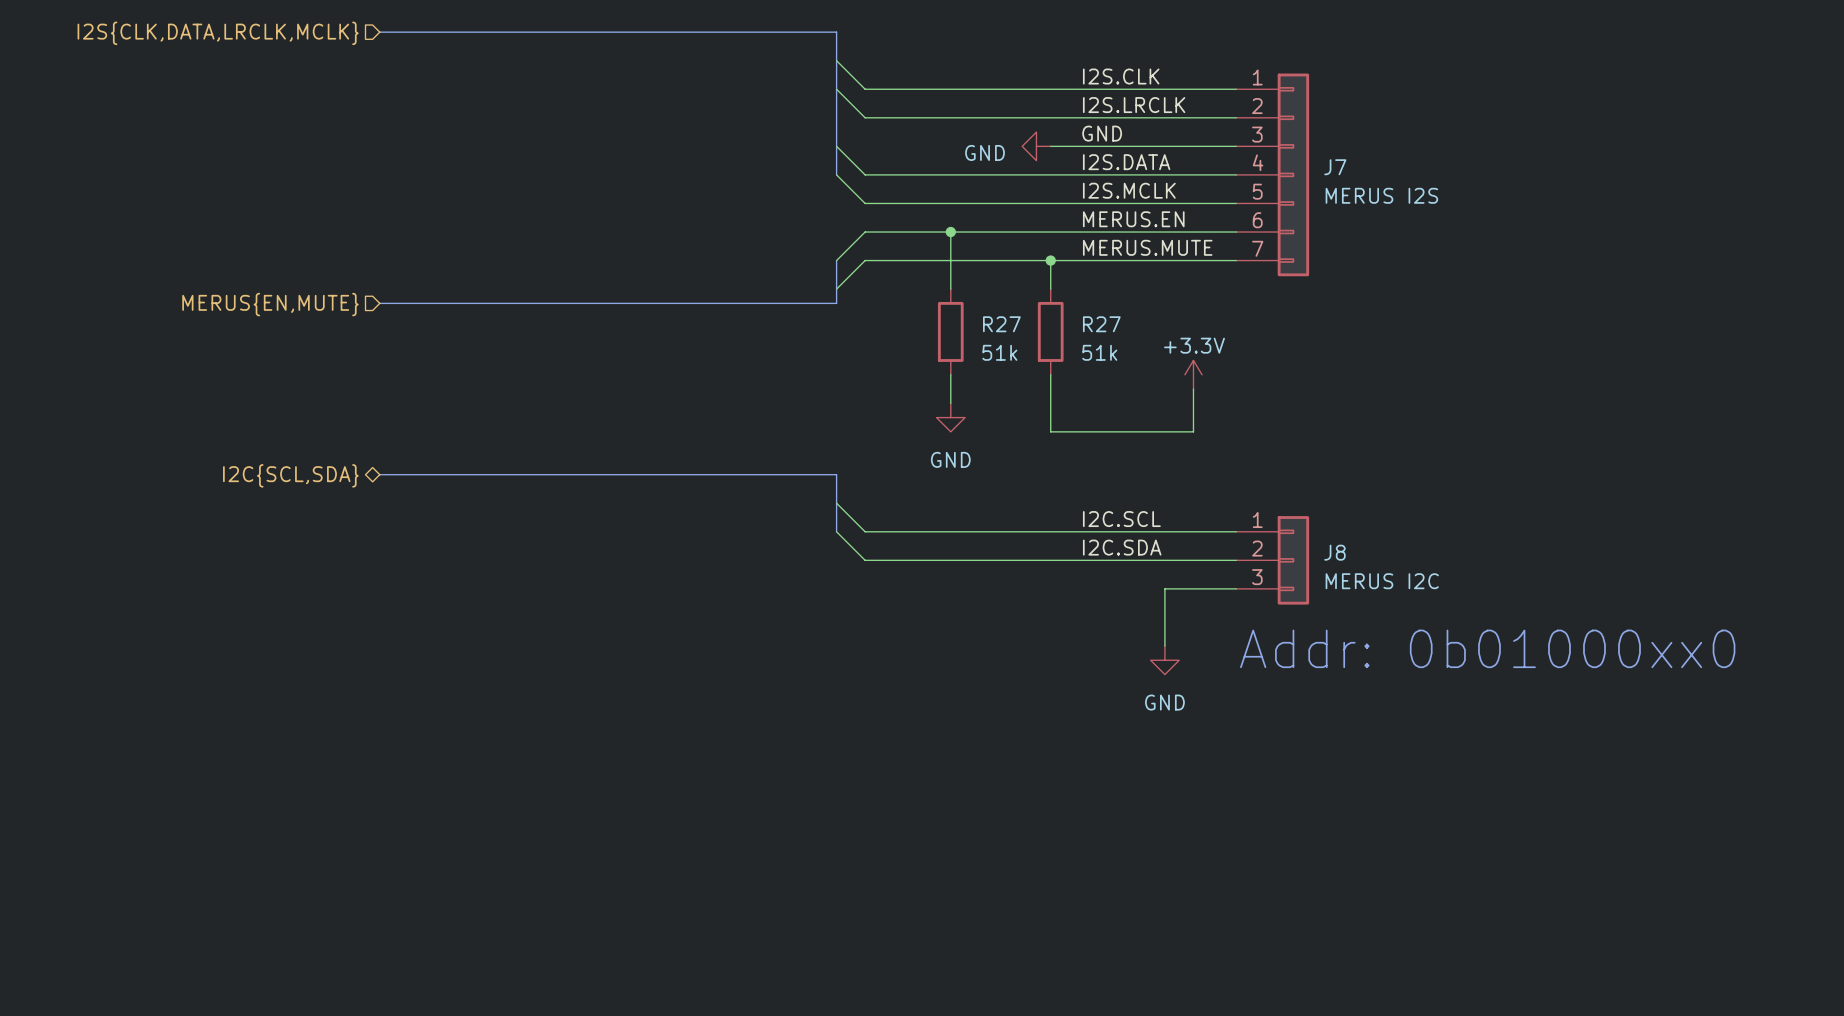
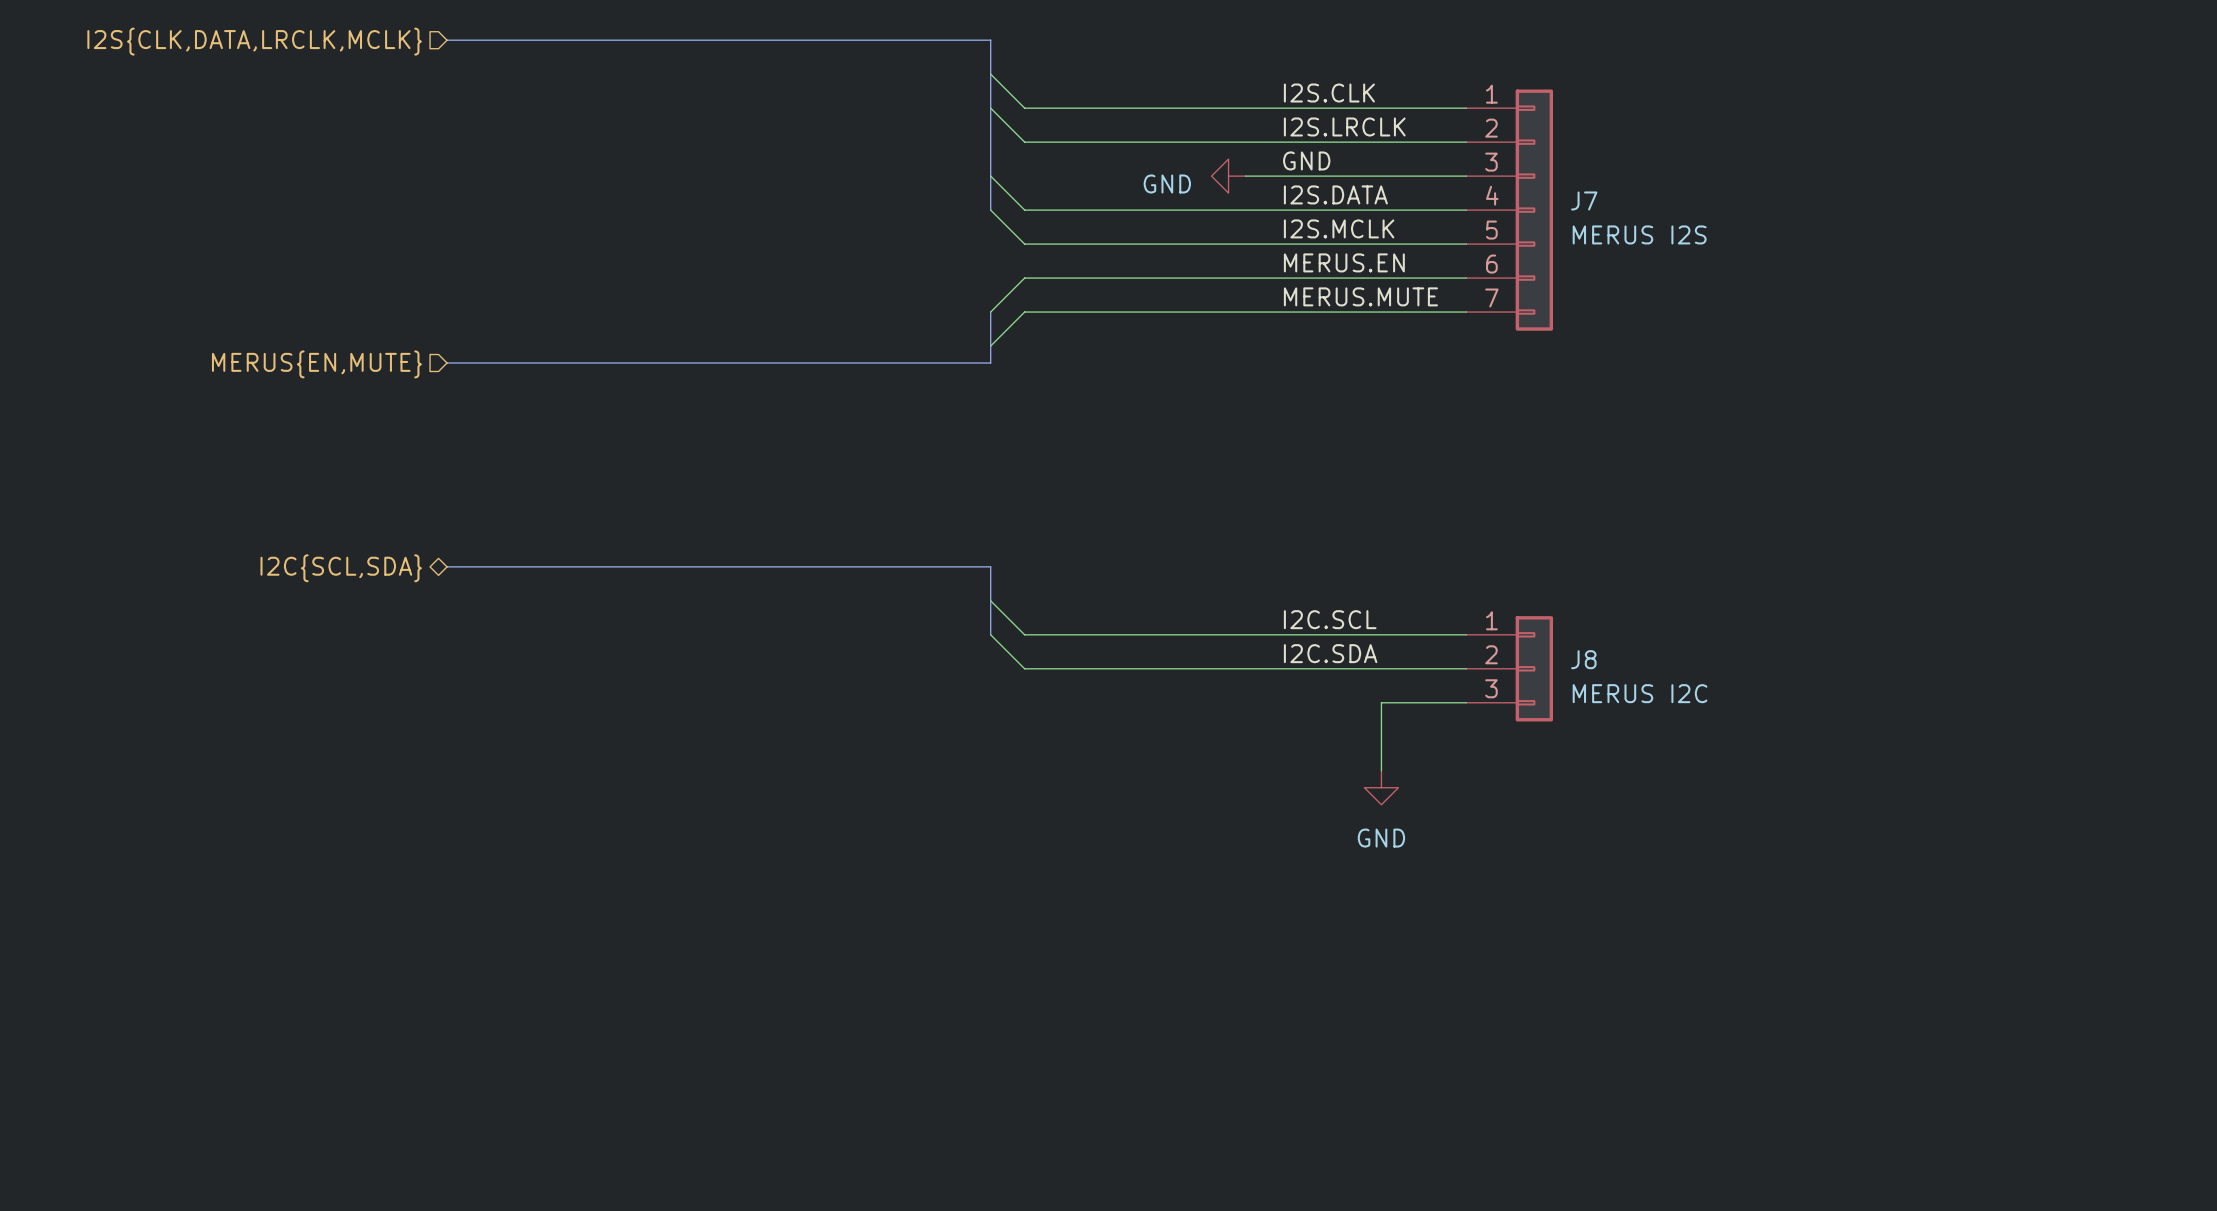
wire: (950, 232) (950, 289) -> none
junction: (950, 232) -> none
wire: (1050, 260) (1050, 289) -> none
junction: (1050, 260) -> none
R27: 51k (950, 331) -> none
R27: 51k (1050, 331) -> none
wire: (950, 374) (950, 403) -> none
wire: (1050, 374) (1050, 431) (1193, 431) (1193, 389) -> none
power symbol: +3.3V (1193, 374) -> none
power symbol: GND (950, 417) -> none
text: Addr: 0b01000xx0 (1487, 648) -> none

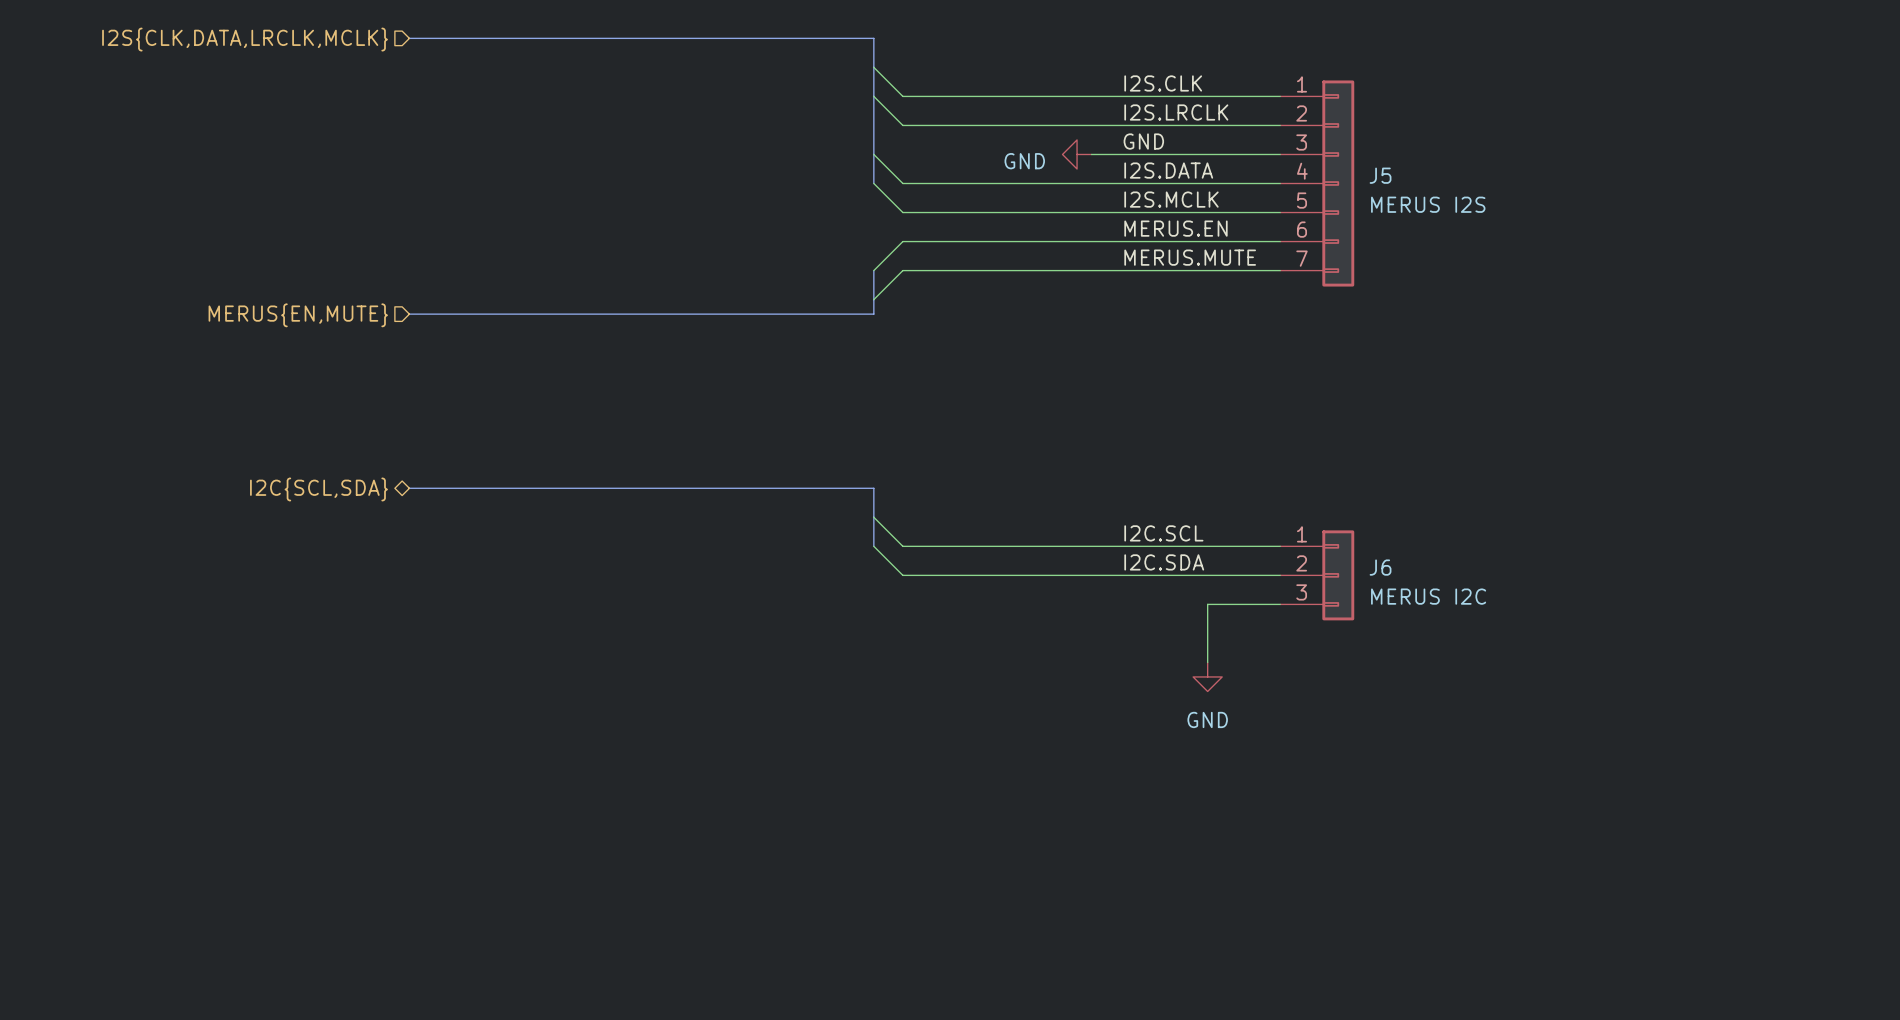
J7 name: J7 (1584, 200) -> J5 (1380, 175)
J8 name: J8 (1583, 659) -> J6 (1380, 567)

